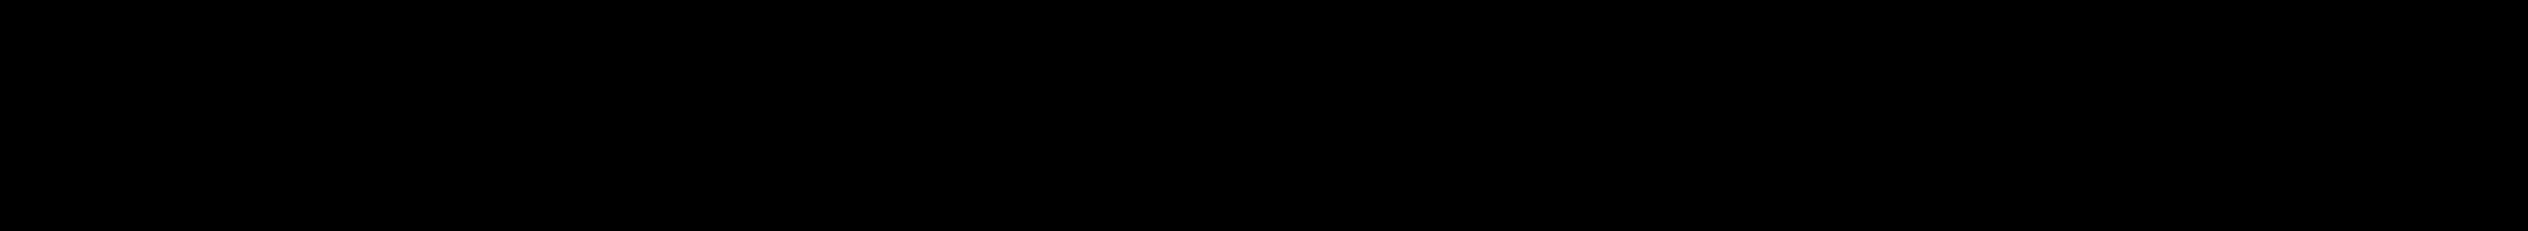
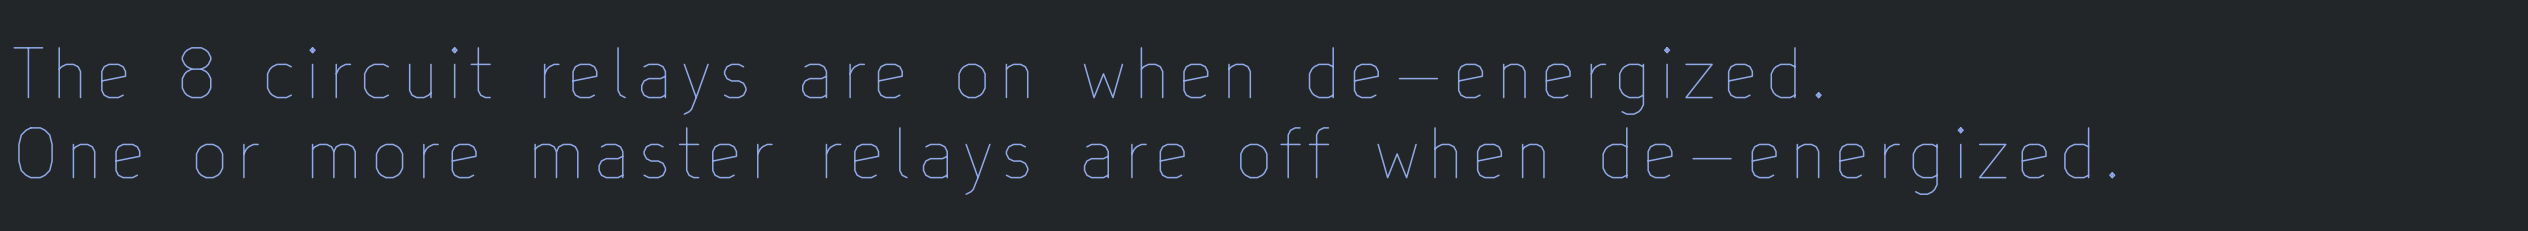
text: none -> The 8 circuit relays are on when de-energized. (917, 80)
text: none -> One or more master relays are off when de-energized. (1066, 161)

